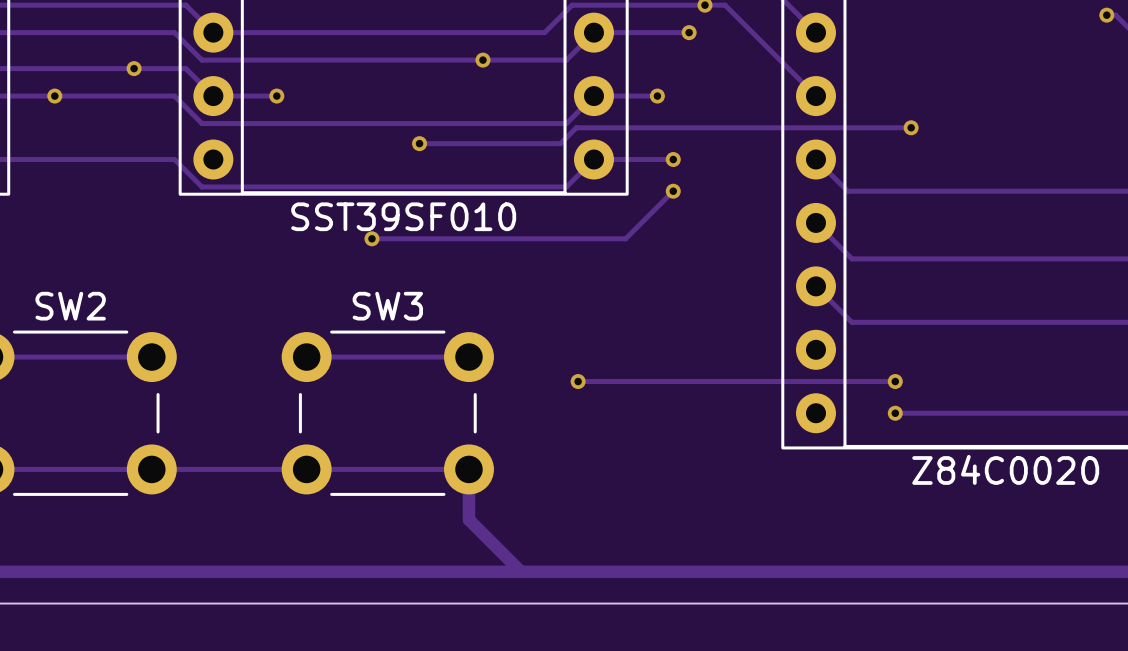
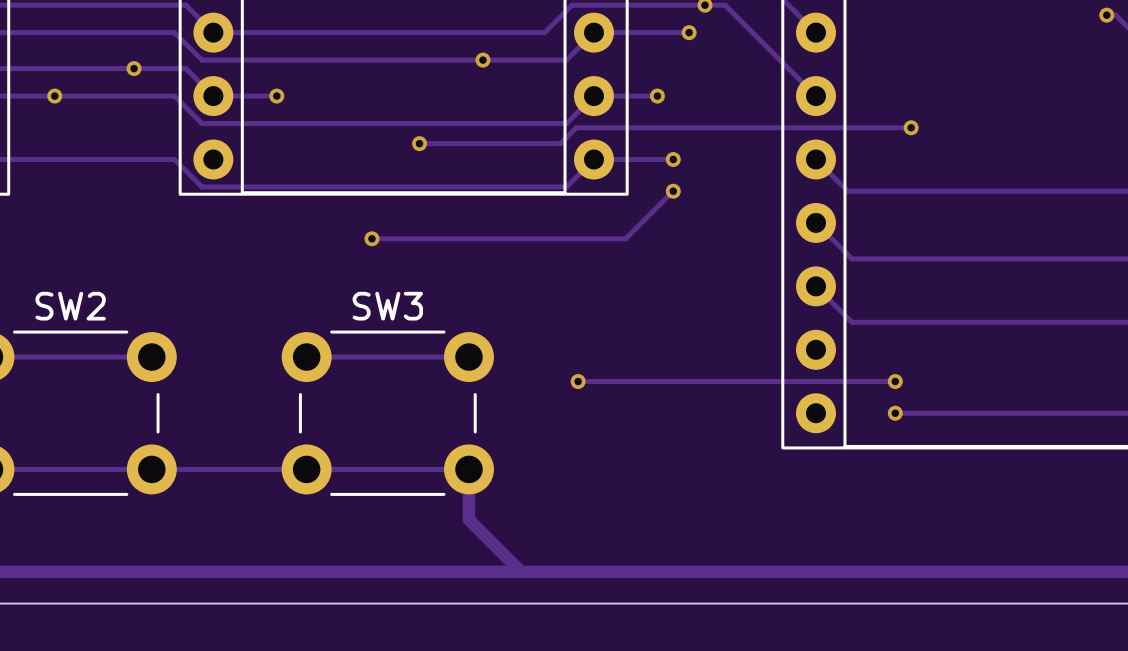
part value: SST39SF010 (403, 216) -> none
part value: Z84C0020 (1005, 469) -> none

